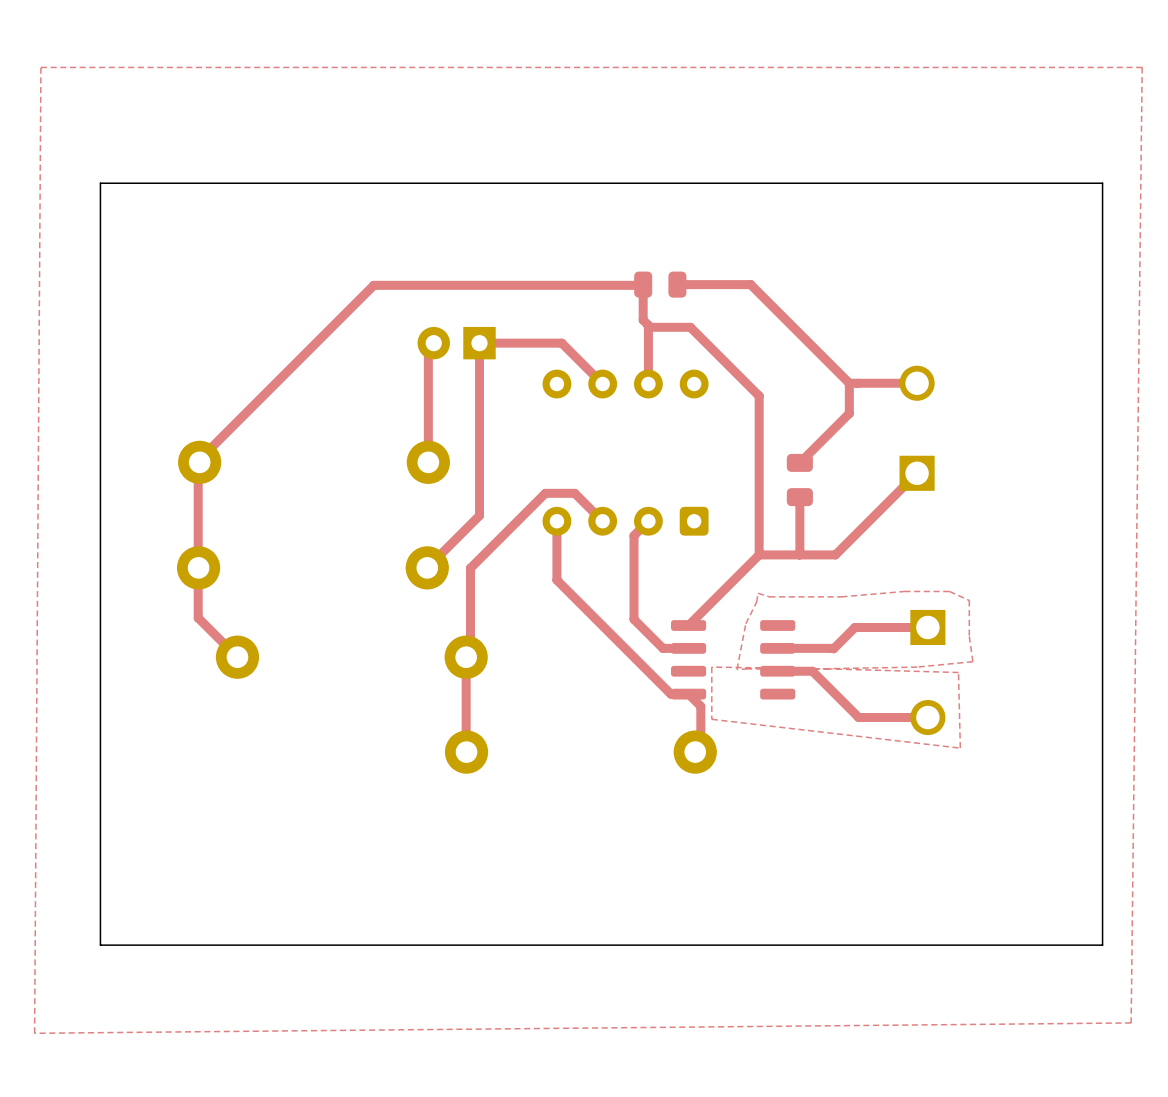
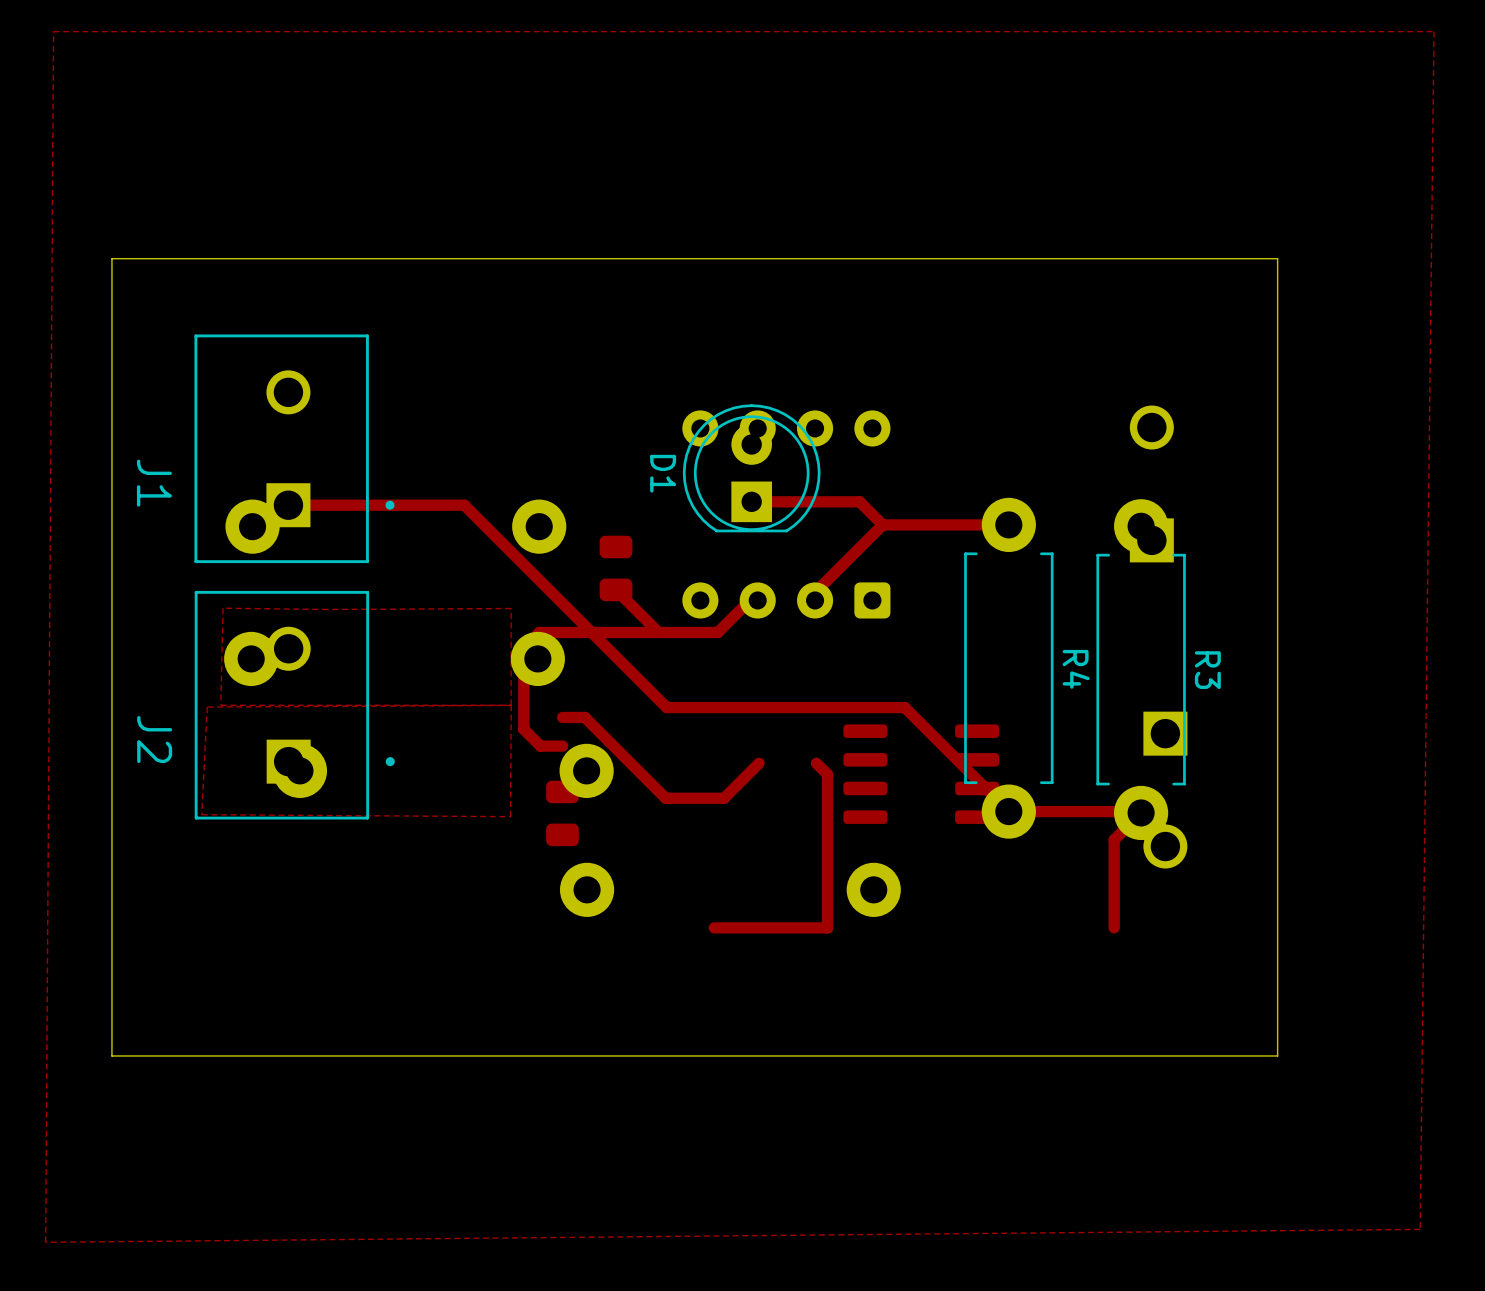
board edge: (1102, 183) (100, 183) (100, 945) (1102, 945) (1102, 183) -> (1277, 258) (1277, 1055) (111, 1055) (111, 258) (1277, 258)
part: (660, 284) -> none
top track: (677, 284) (750, 284) (849, 383) -> none
top track: (648, 327) (690, 327) (759, 396) (759, 554) -> none
top track: (433, 343) (428, 348) (428, 462) -> none
D1 side: top (456, 343) -> bottom (751, 468)
top track: (849, 383) (849, 413) (799, 462) -> none
top track: (917, 383) (849, 383) -> none
top track: (602, 384) (561, 343) (479, 343) (479, 515) (427, 567) -> none
top track: (648, 384) (648, 325) (643, 320) (643, 284) (373, 285) (198, 460) (198, 617) (237, 657) -> none
J1: none -> (294, 448)
top track: none -> (751, 501) (859, 501) (882, 524)
top track: none -> (288, 505) (464, 505) (666, 707) (904, 707) (1008, 811) (1139, 811) (1141, 812) (1114, 839) (1114, 927)
top track: none -> (882, 524) (816, 591)
top track: none -> (1008, 524) (882, 524)
top track: (917, 473) (835, 554) (759, 554) -> none
part: (799, 480) -> none
part: none -> (616, 568)
top track: (799, 497) (799, 554) -> none
top track: none -> (616, 589) (658, 632)
top track: none -> (759, 591) (717, 632) (539, 632) (523, 648) (523, 729) (540, 746) (562, 746)
top track: (556, 521) (556, 580) (670, 694) (688, 694) (700, 706) (700, 746) (695, 752) -> none
top track: (602, 521) (574, 493) (545, 493) (470, 568) (470, 652) (466, 657) (466, 736) (472, 742) (472, 746) (466, 752) -> none
top track: (648, 521) (634, 535) (634, 619) (662, 648) (688, 648) -> none
top zone outline: none -> (223, 608) (511, 608) (511, 705) (220, 705) (223, 608)
top track: (759, 554) (688, 625) -> none
R4: none -> (1008, 668)
R3: none -> (1141, 669)
top zone outline: (949, 591) (904, 591) (841, 596) (769, 596) (758, 593) (756, 602) (745, 623) (737, 669) (917, 667) (972, 661) (969, 636) (969, 600) (949, 591) -> none
J2: none -> (294, 705)
top zone outline: none -> (511, 705) (510, 816) (201, 814) (207, 707) (511, 705)
top track: none -> (562, 717) (584, 717) (665, 798) (724, 798) (759, 763)
top track: (927, 627) (854, 627) (833, 648) (777, 648) -> none
top track: none -> (816, 763) (827, 774) (827, 927) (714, 927)
top zone outline: (711, 667) (711, 719) (960, 748) (958, 672) (711, 667) -> none
top track: (777, 671) (812, 671) (858, 717) (927, 717) -> none
part: none -> (562, 813)

